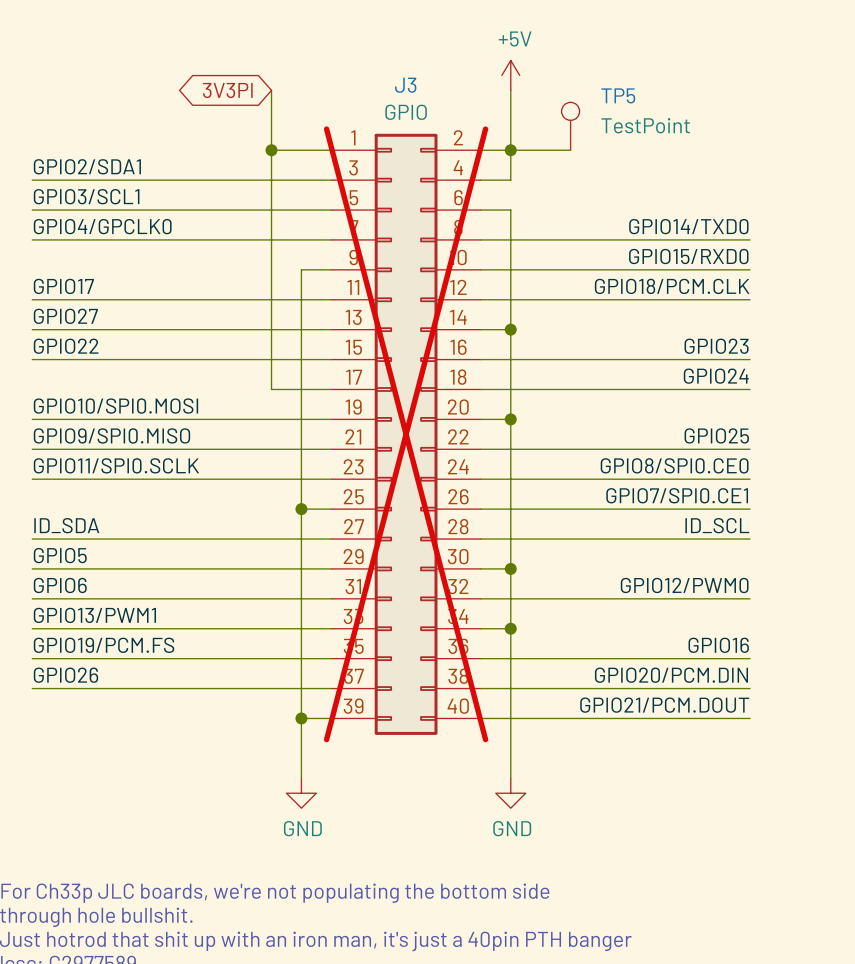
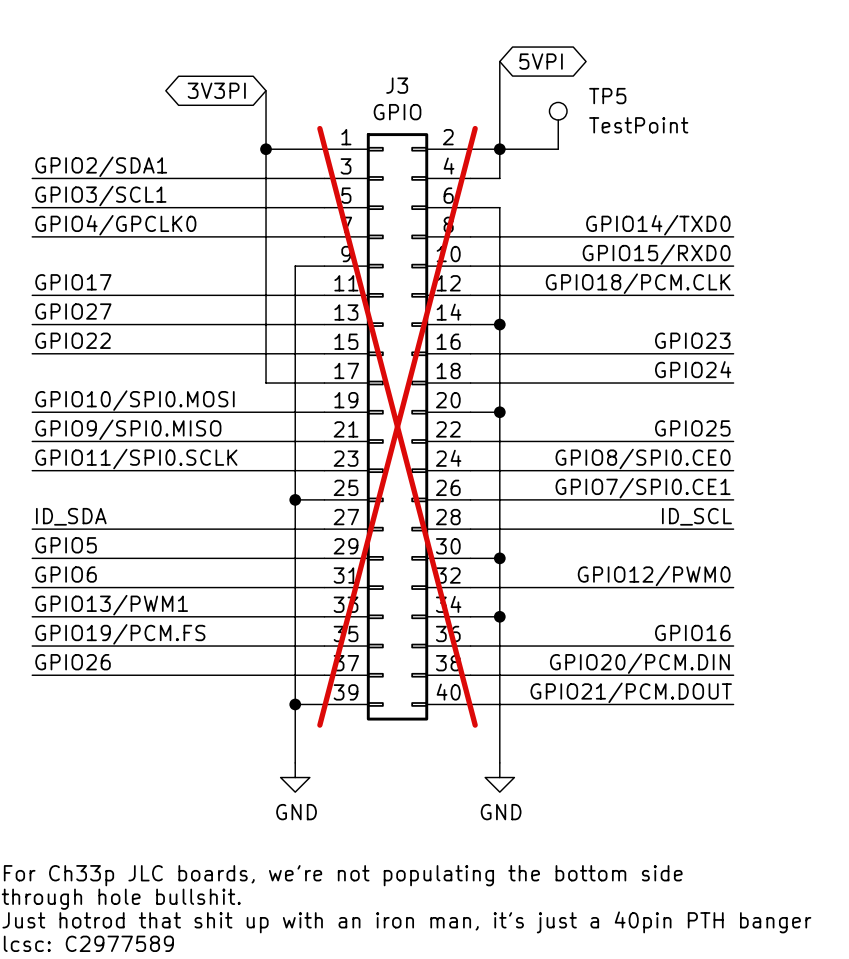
global label: none -> 5VPI (541, 61)
power symbol: +5V (510, 75) -> none

